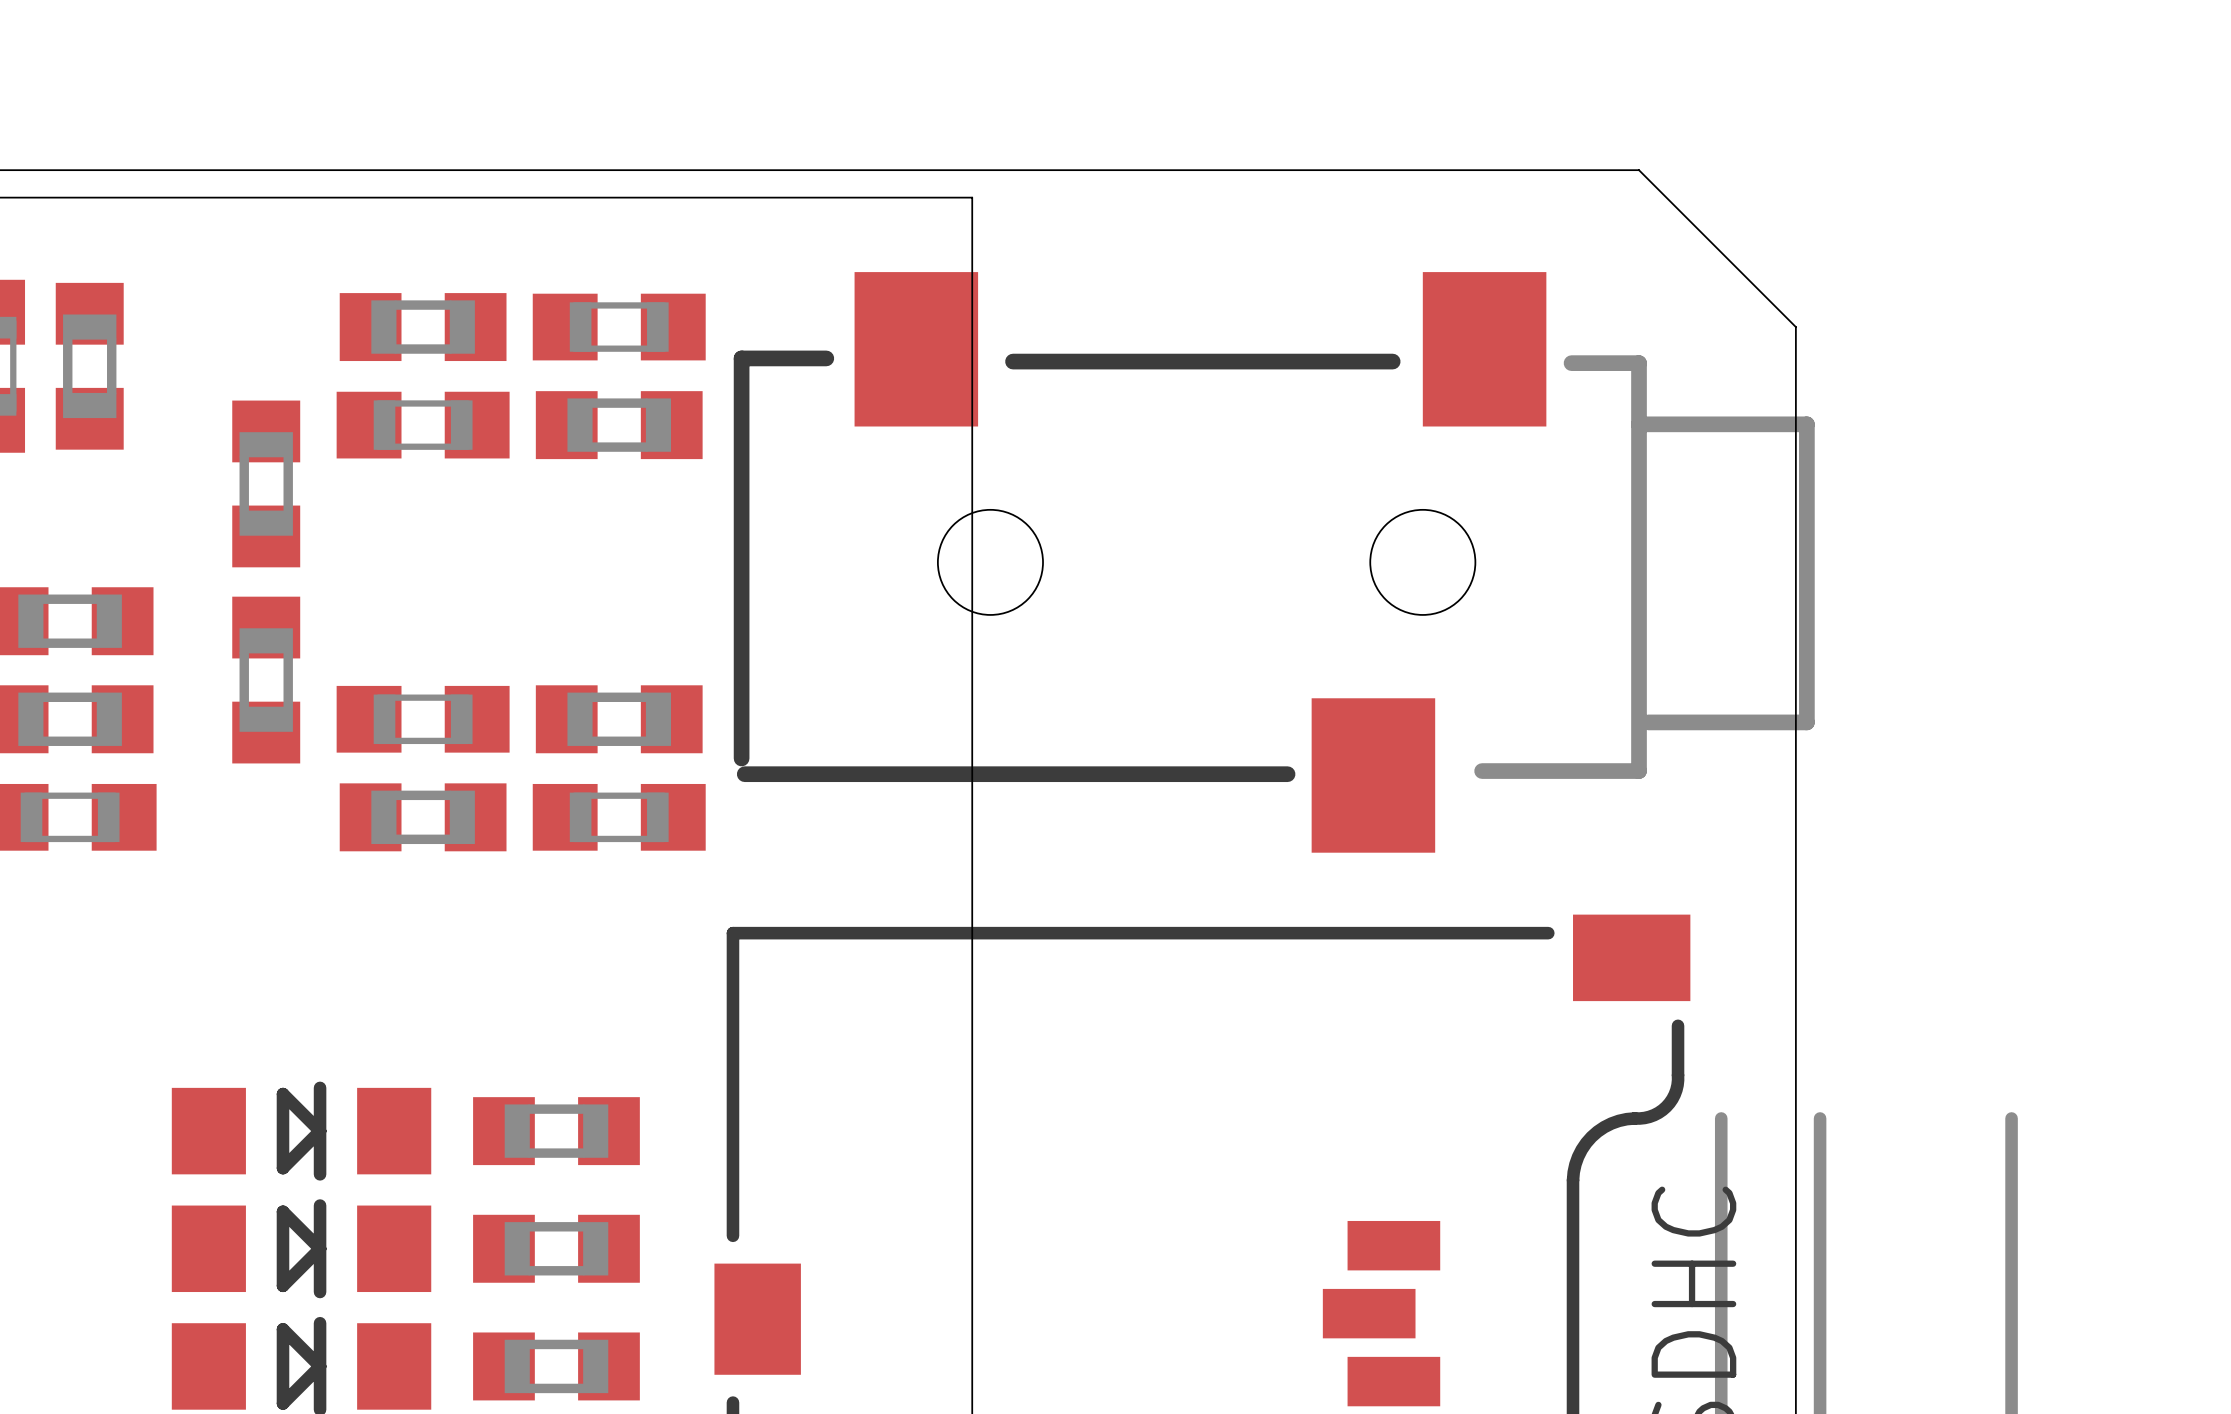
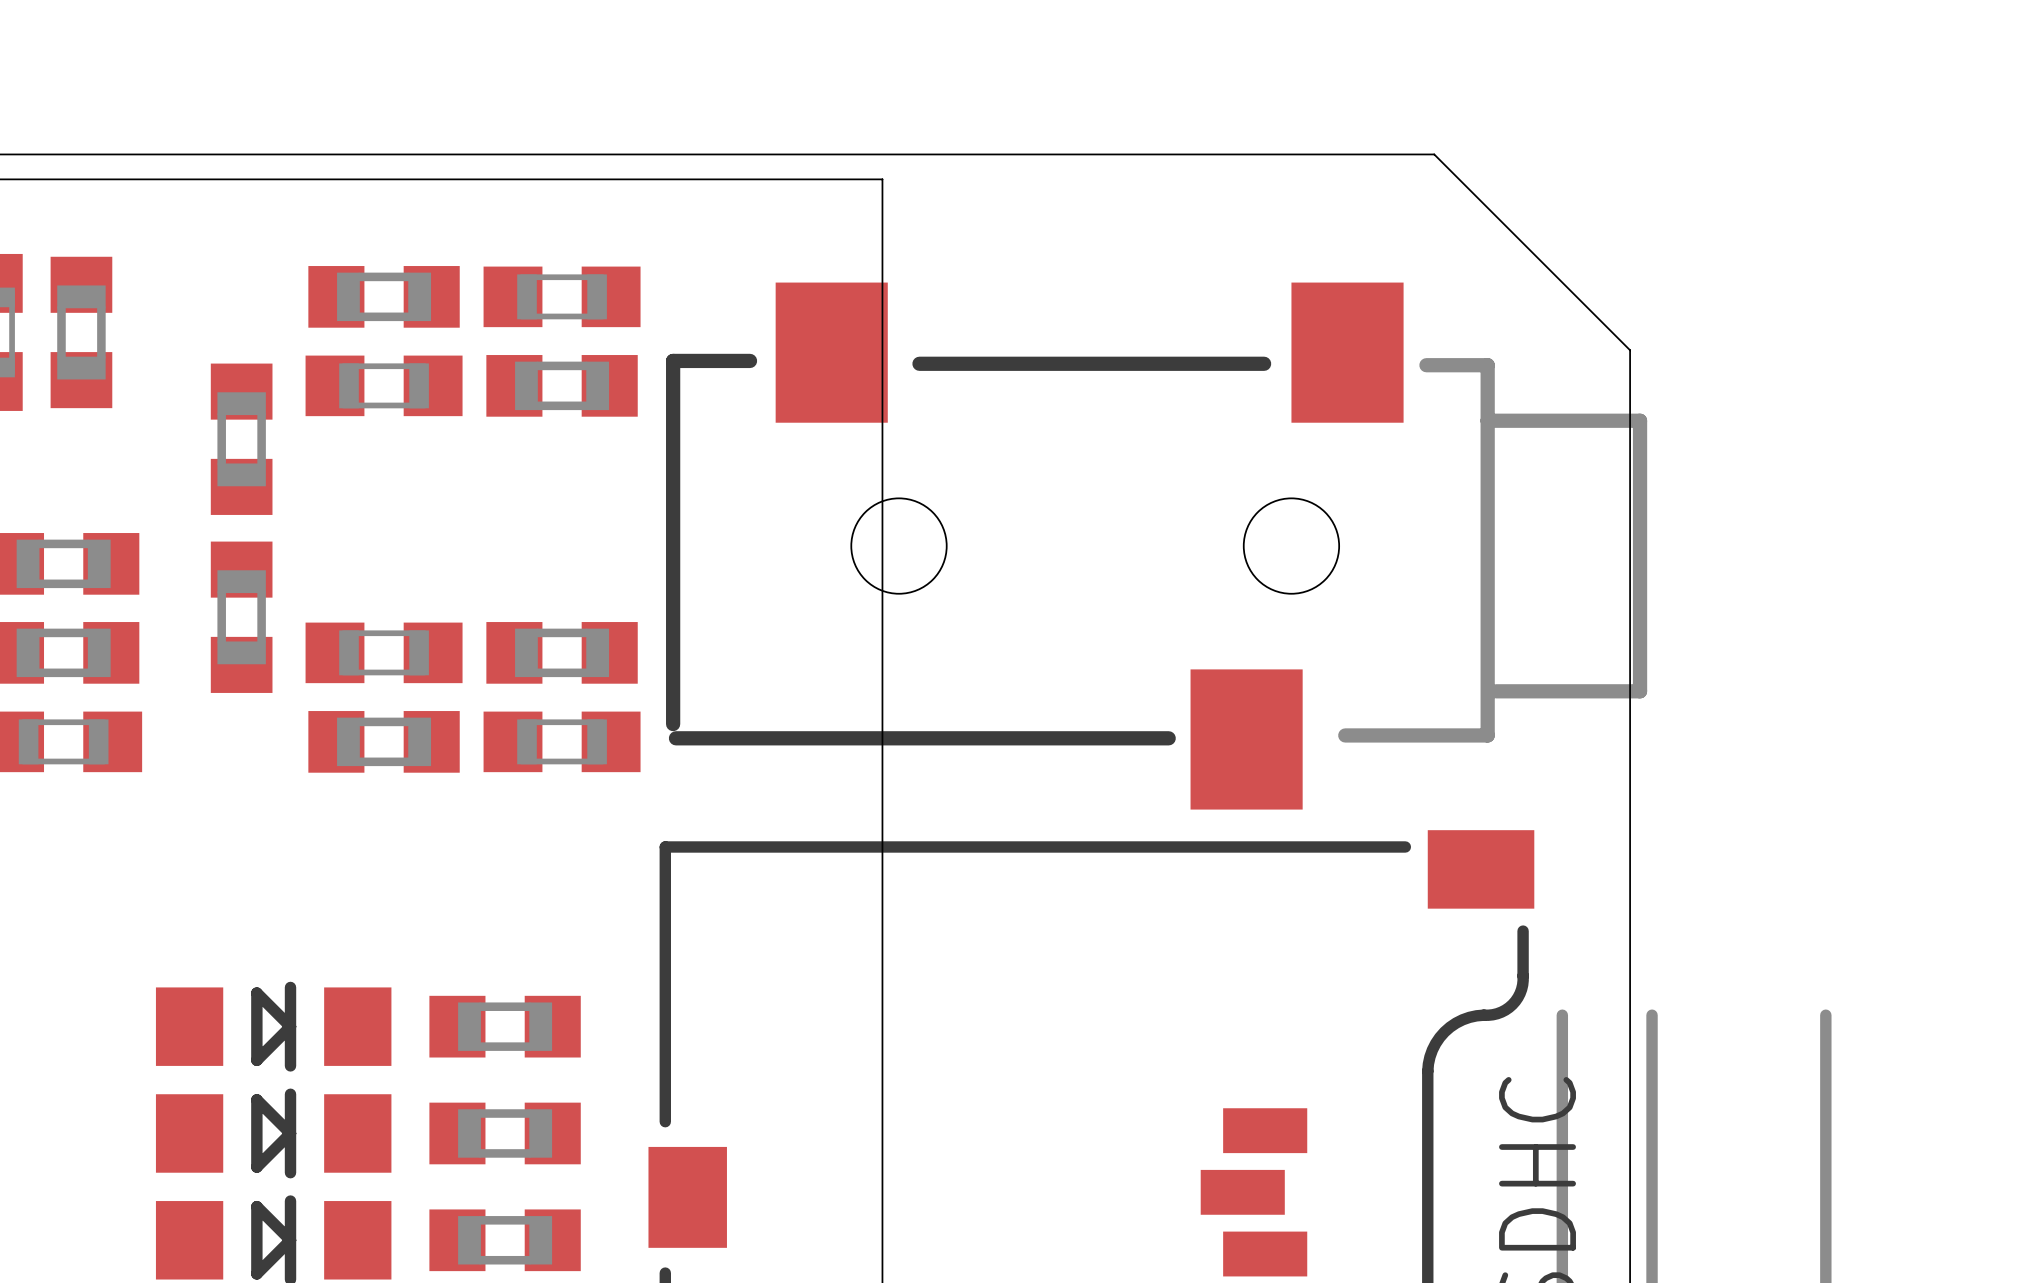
board edge: (1580, 170) (1639, 170) (1795, 327) (1795, 385) -> (1434, 154) (1630, 350)
part position: (1274, 562) -> (1156, 546)

